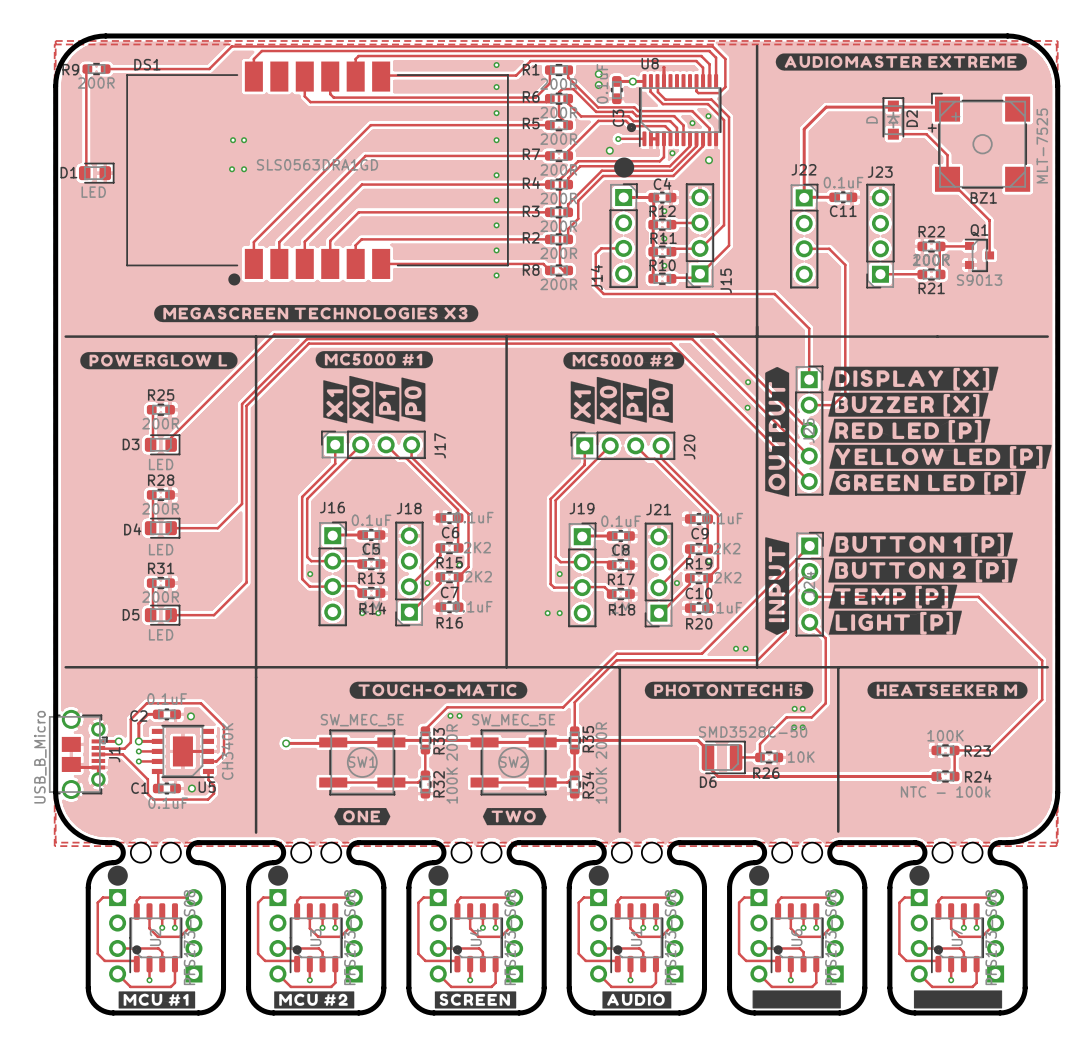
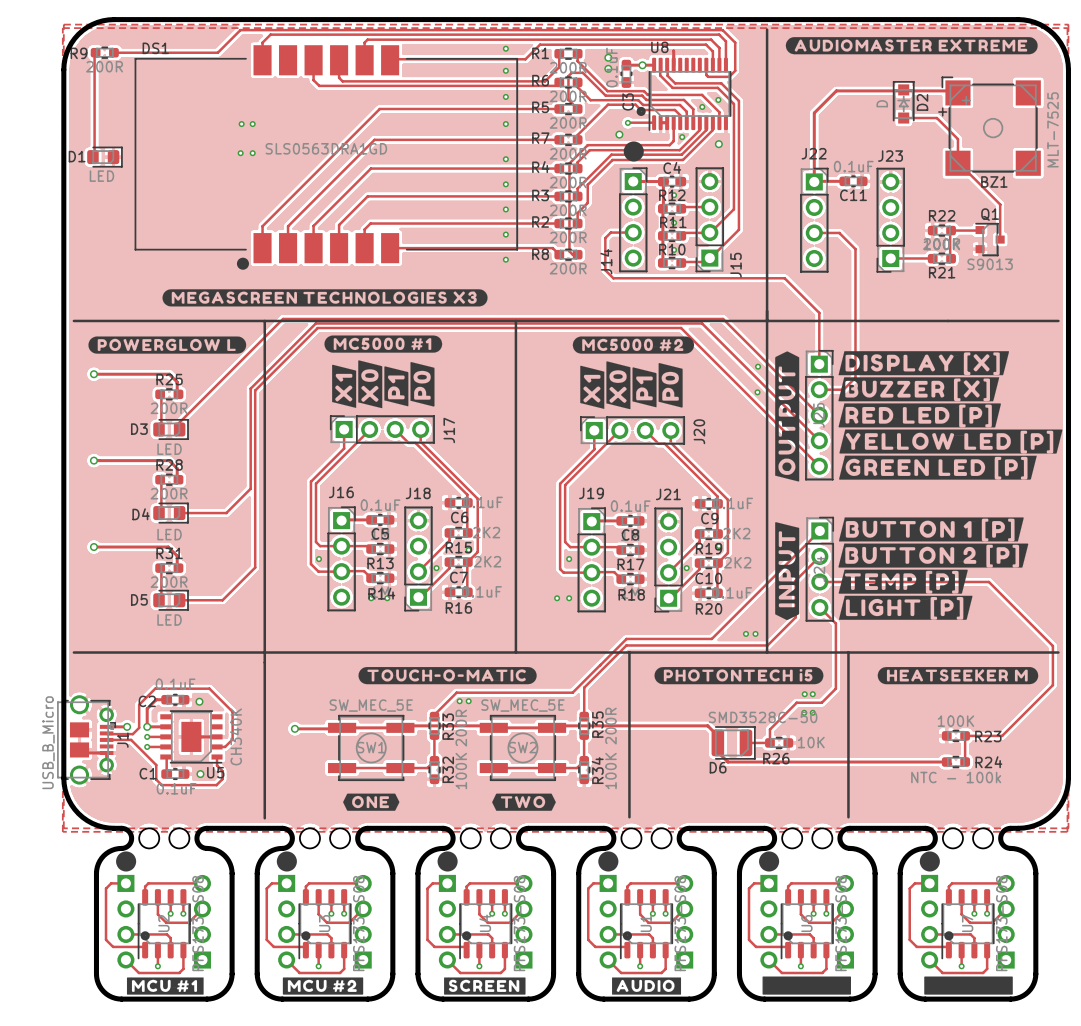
track: none -> (93, 374) (169, 374) (177, 382) (177, 394)
via: none -> (93, 374)
track: none -> (93, 460) (169, 460) (177, 468) (177, 479)
via: none -> (93, 460)
via: none -> (93, 547)
track: none -> (95, 547) (168, 547) (177, 555) (177, 568)

